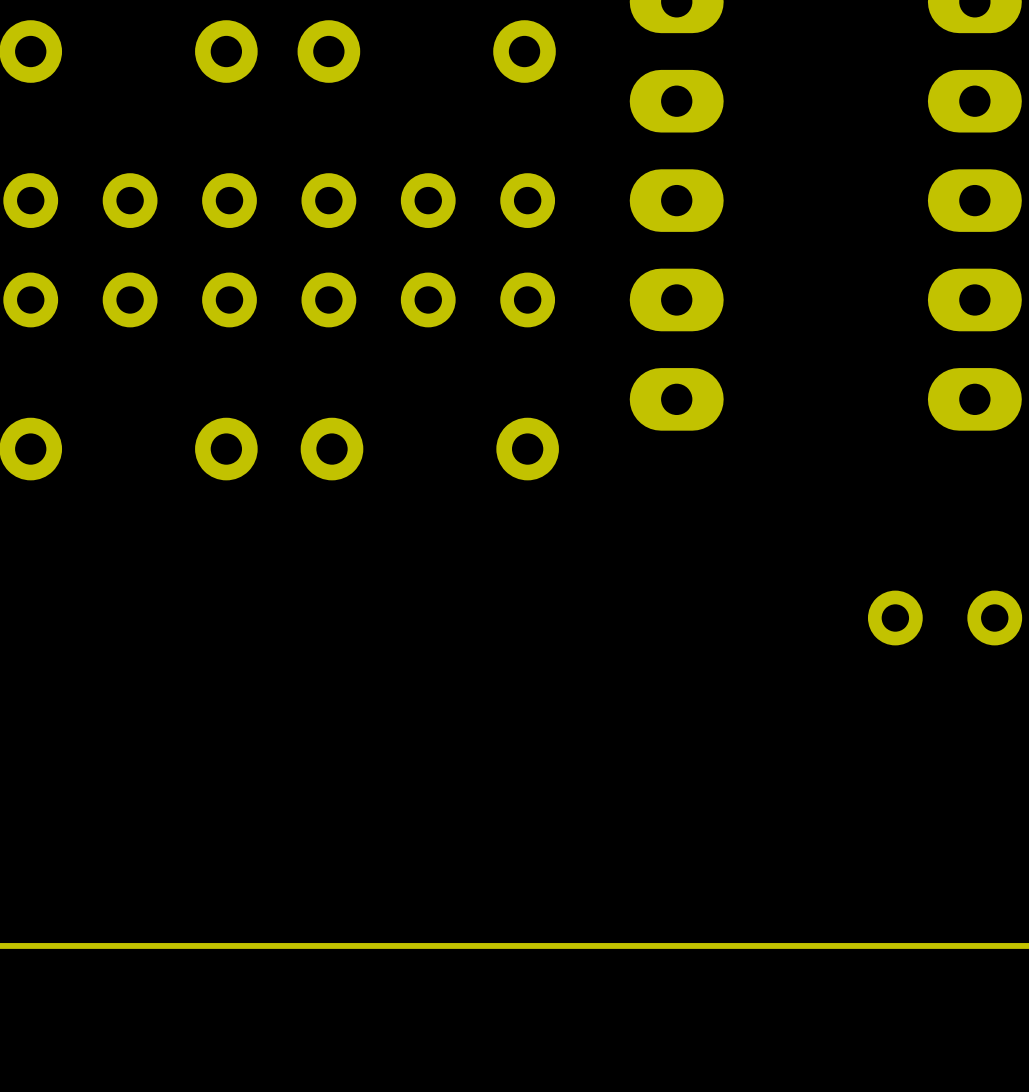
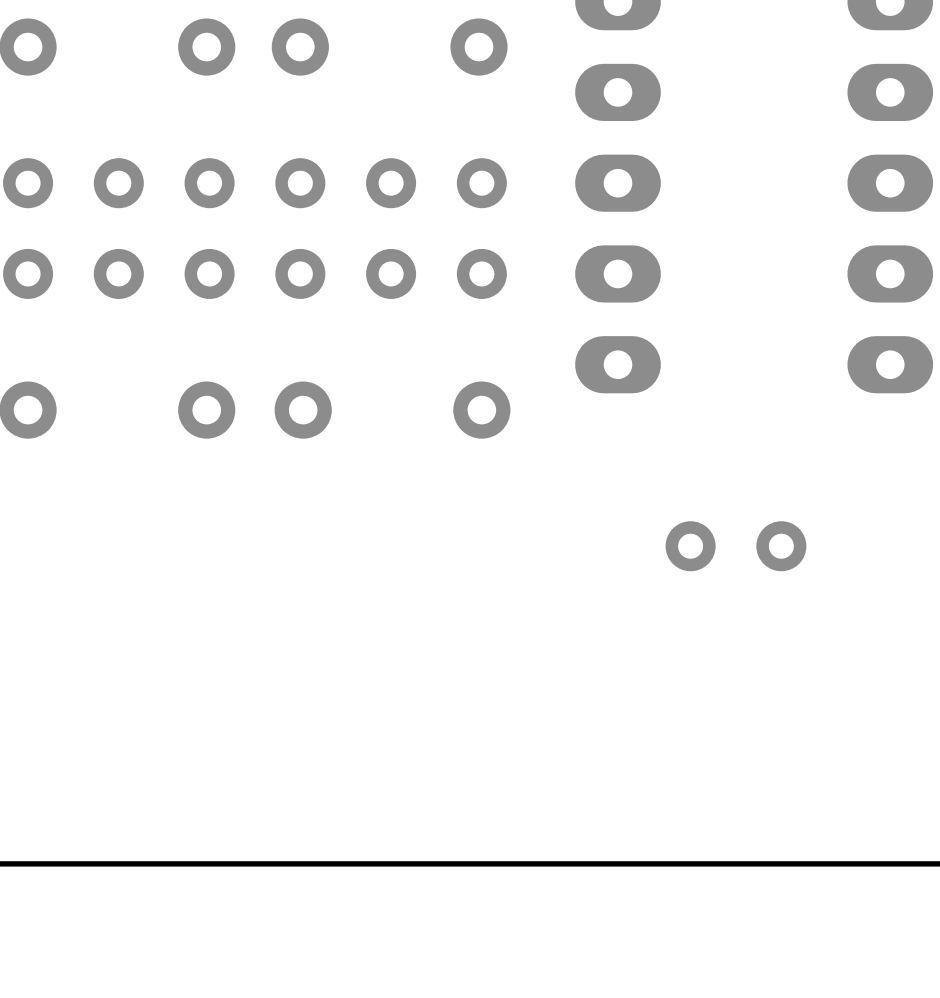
part position: (945, 618) -> (735, 546)

